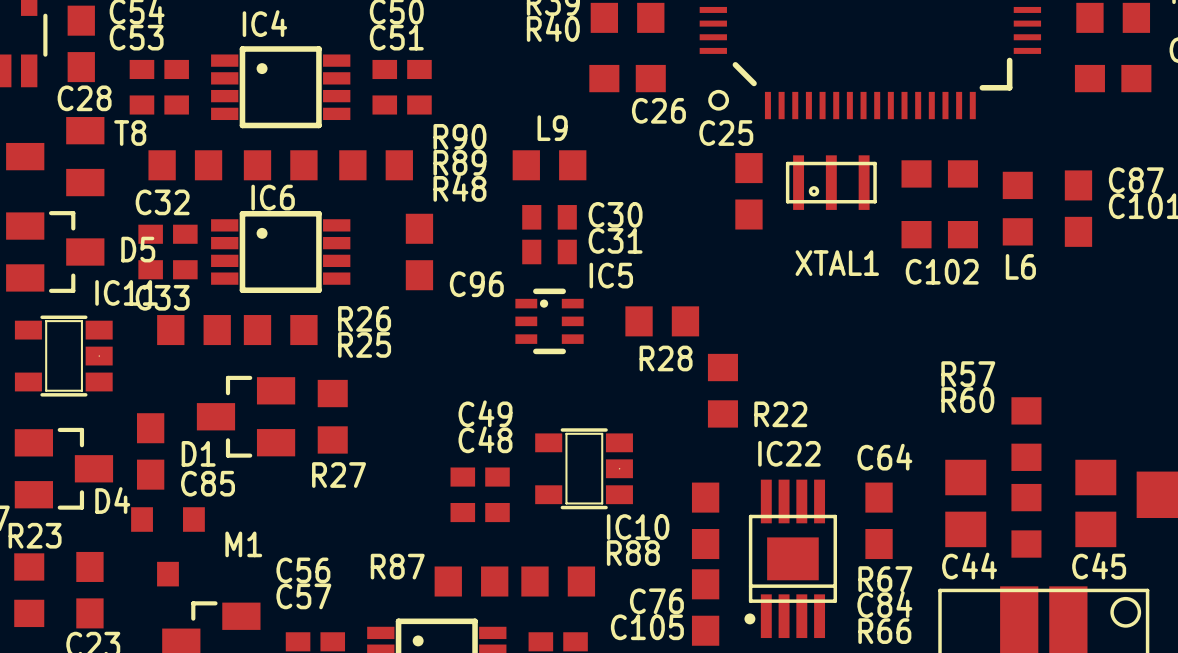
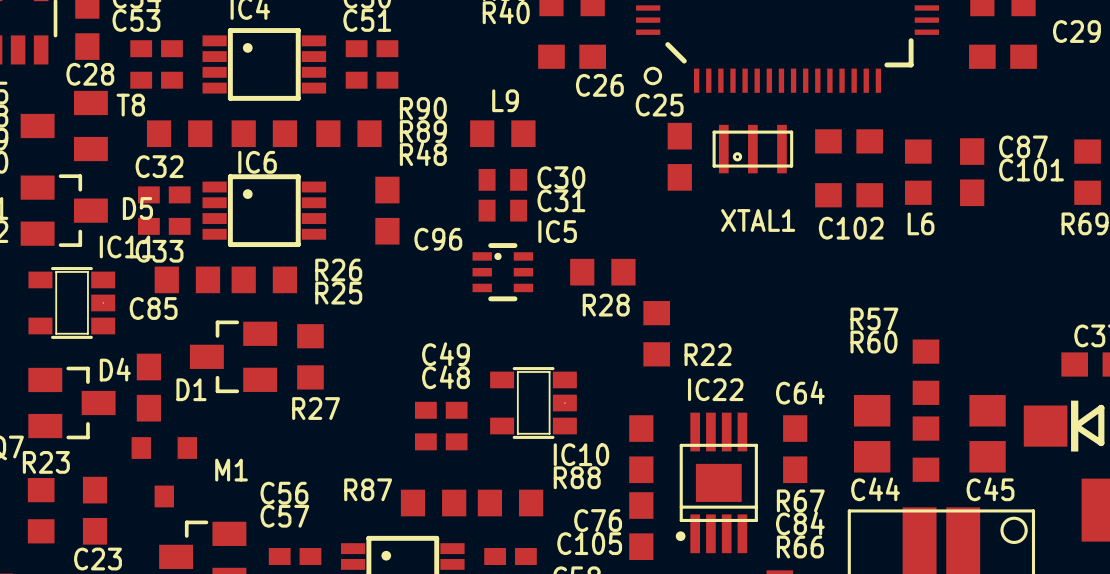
C85 name position: C85 (208, 483) -> C85 (153, 308)
D4 name position: D4 (112, 500) -> D4 (115, 369)

